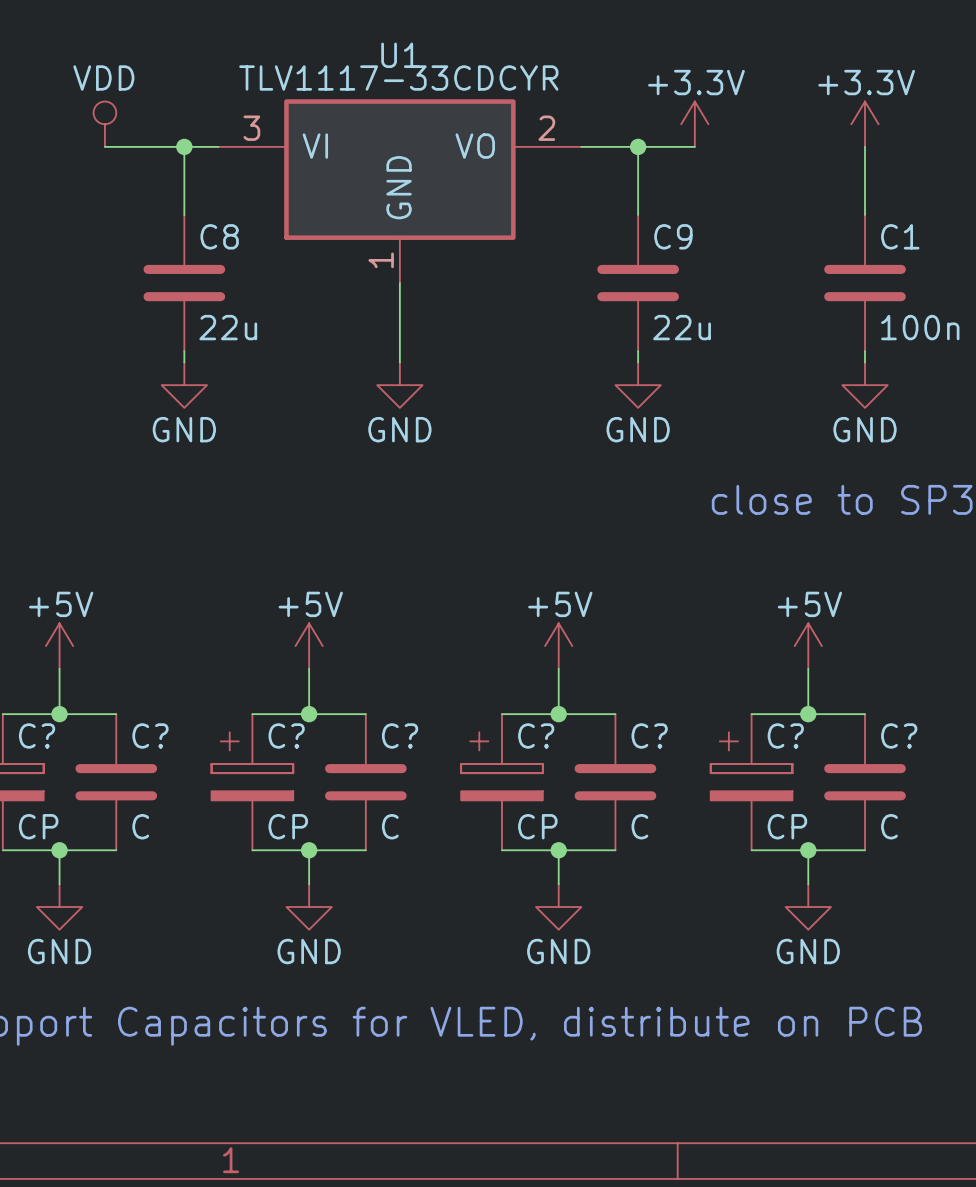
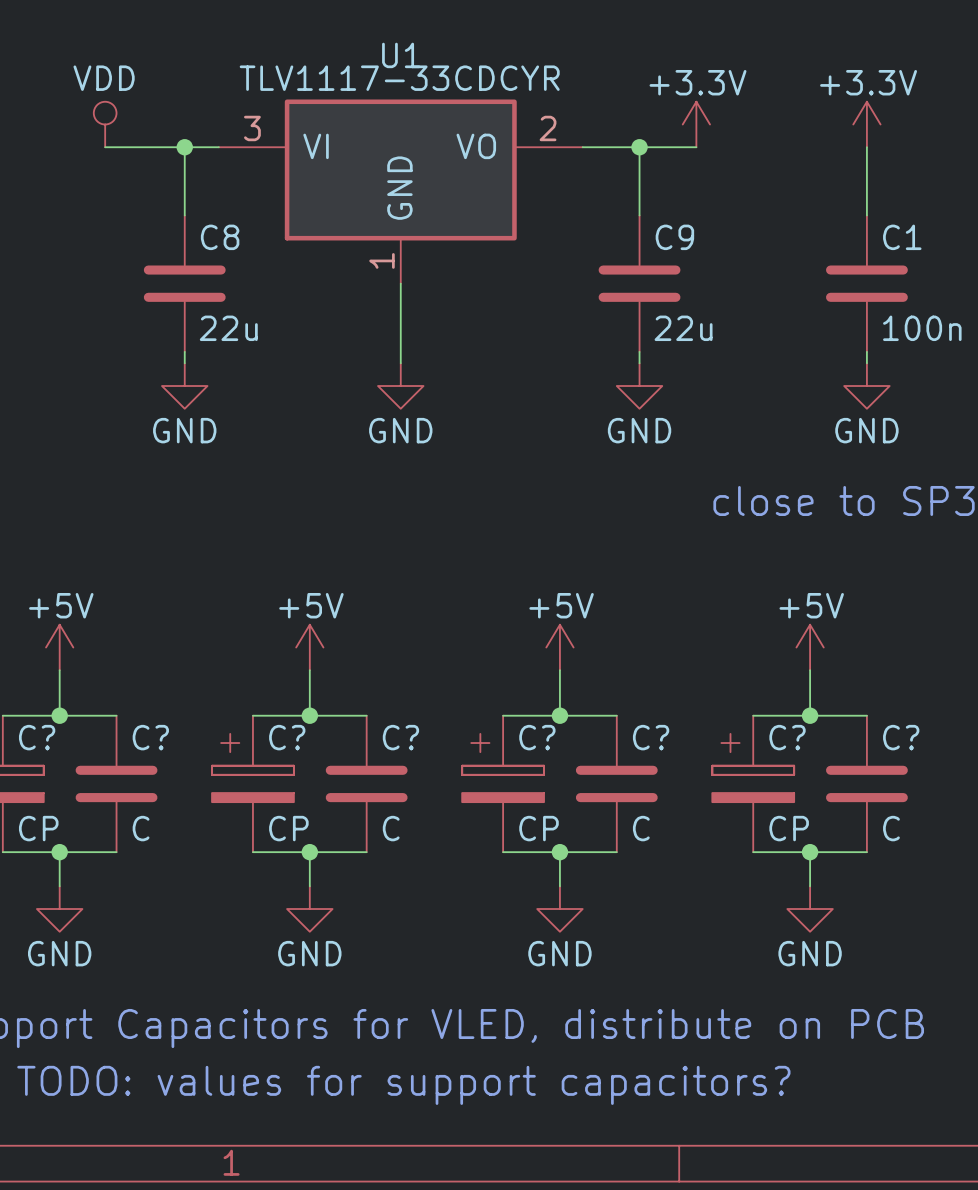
text: none -> TODO: values for support capacitors? (403, 1085)

